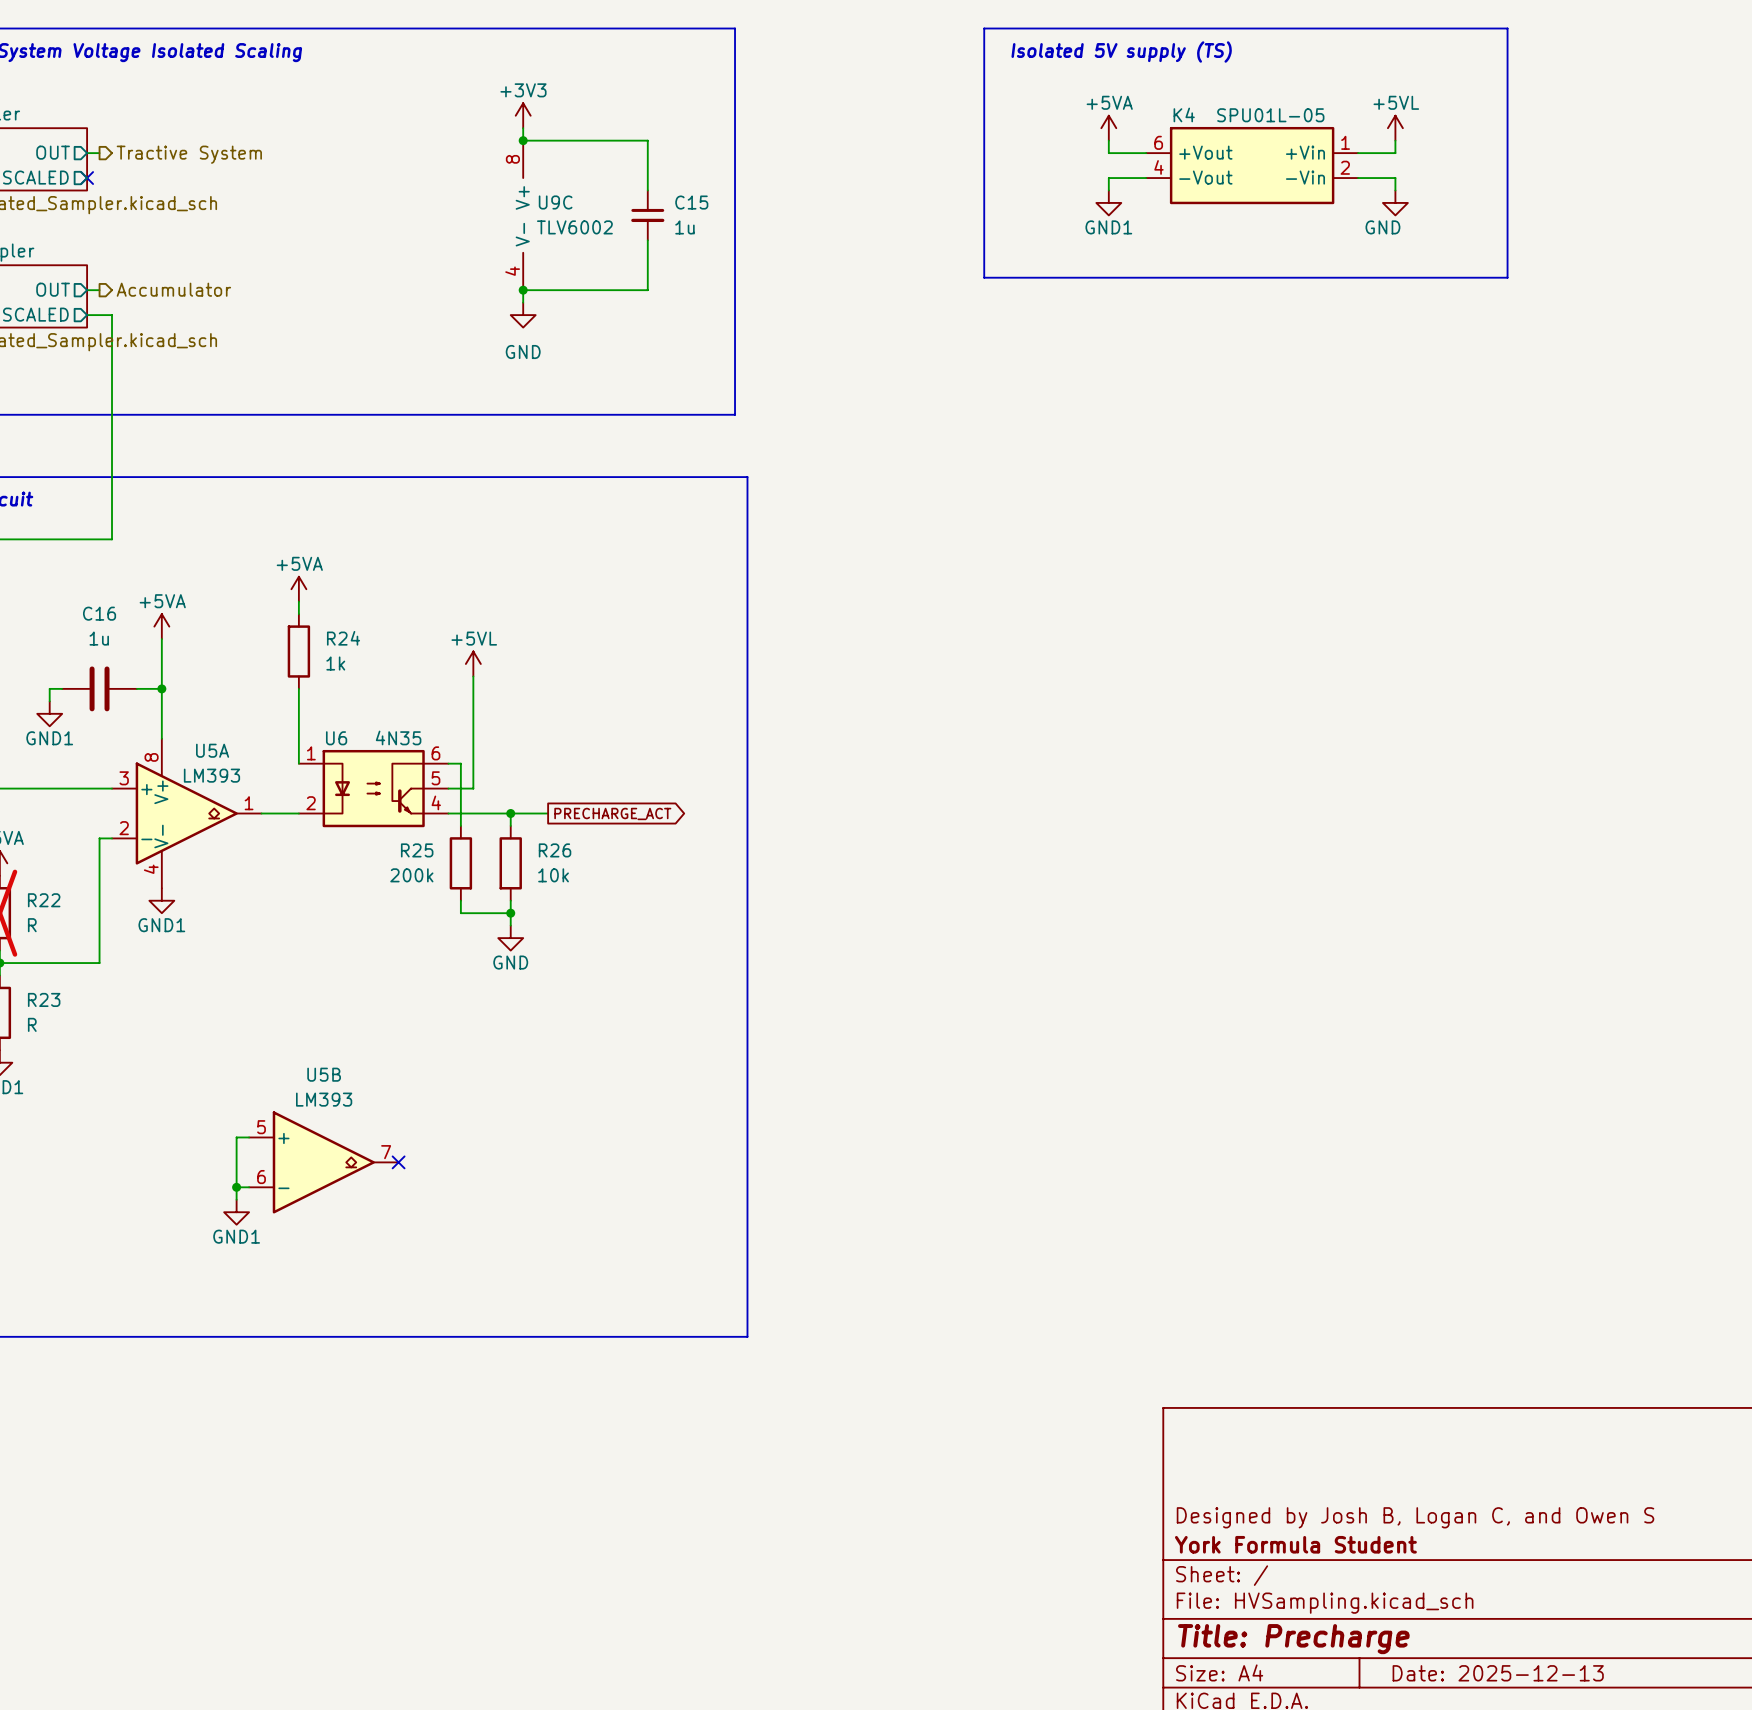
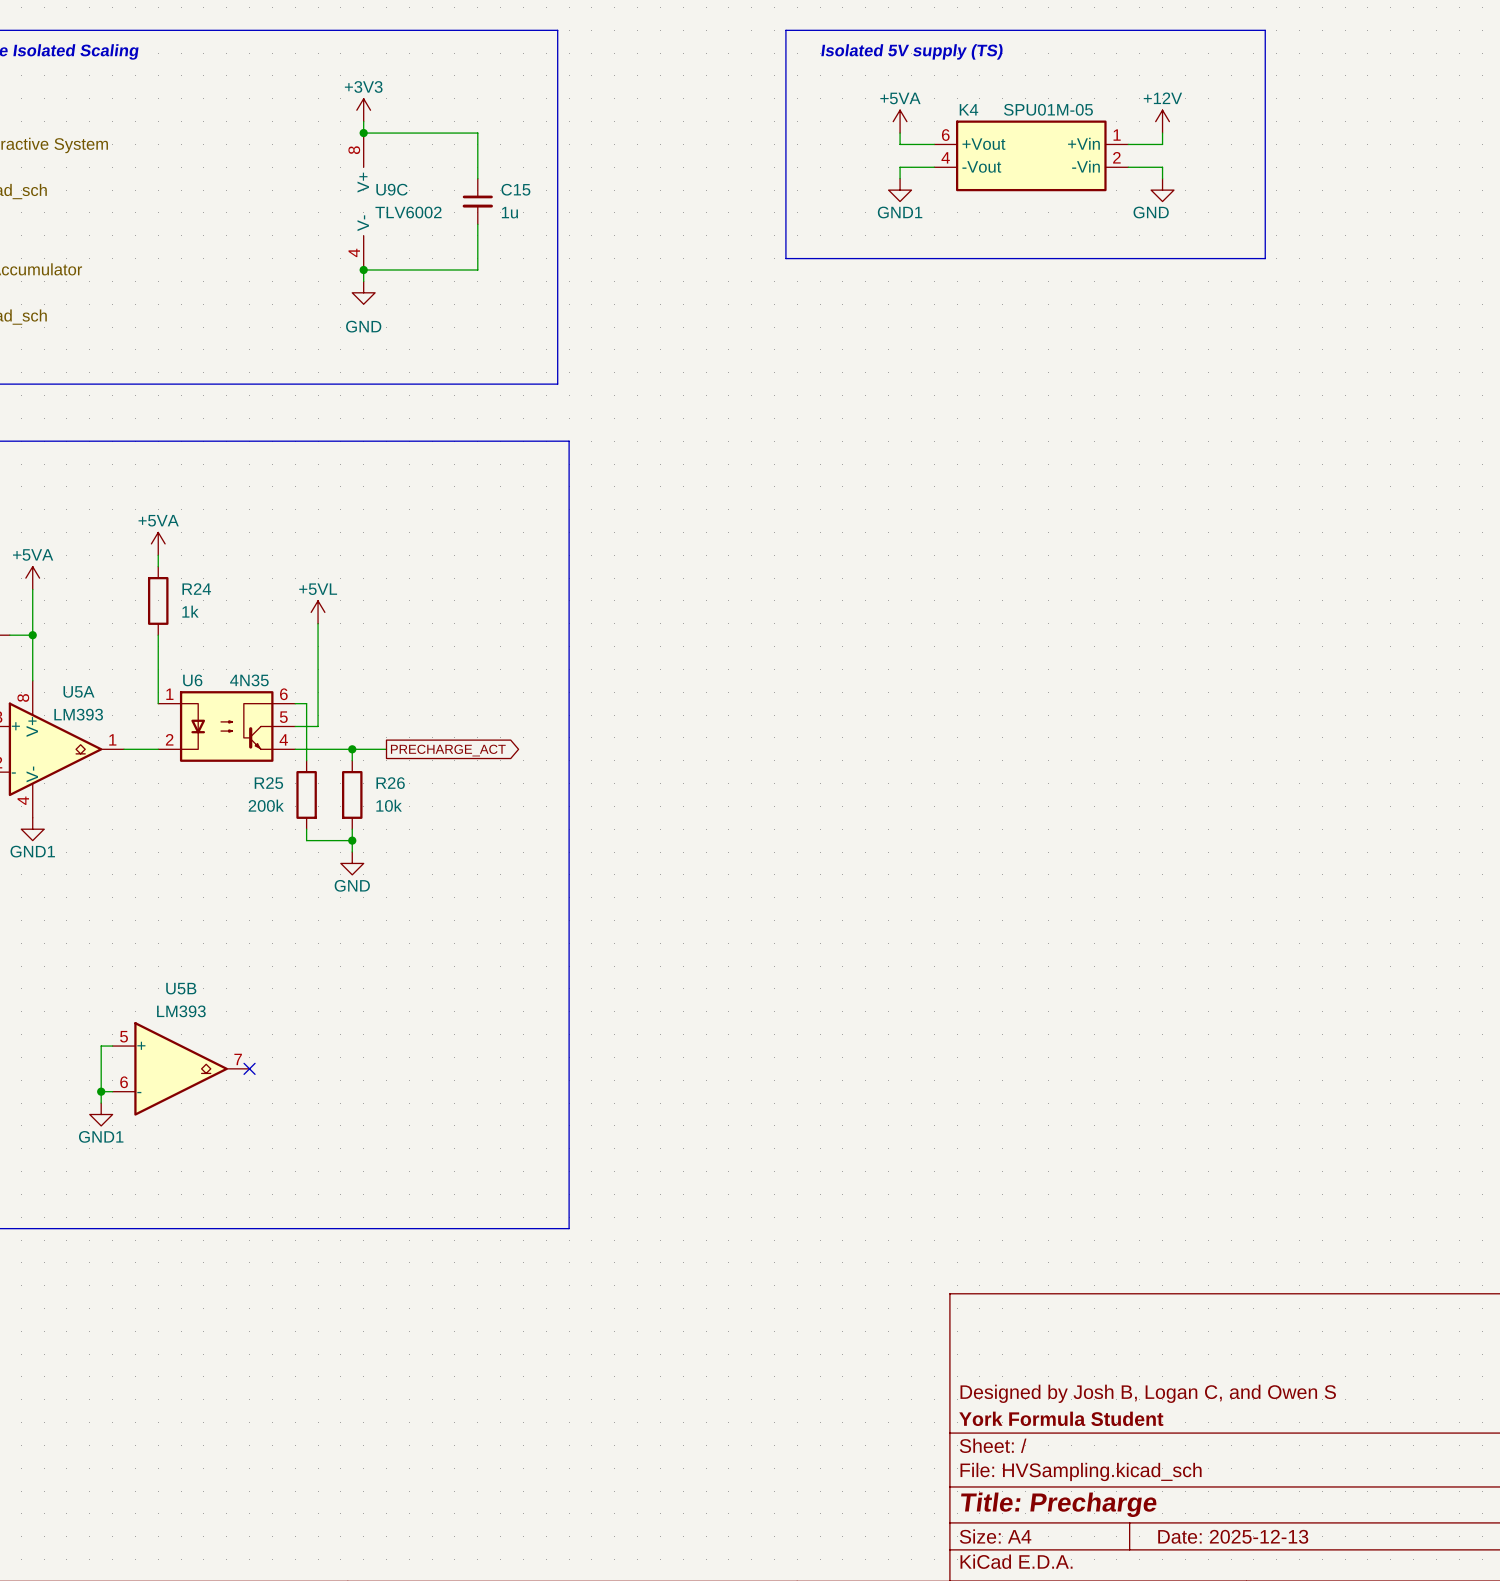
K4 value: SPU01L-05 (1270, 115) -> SPU01M-05 (1048, 109)
power symbol: +5VL (1395, 128) -> +12V (1162, 121)

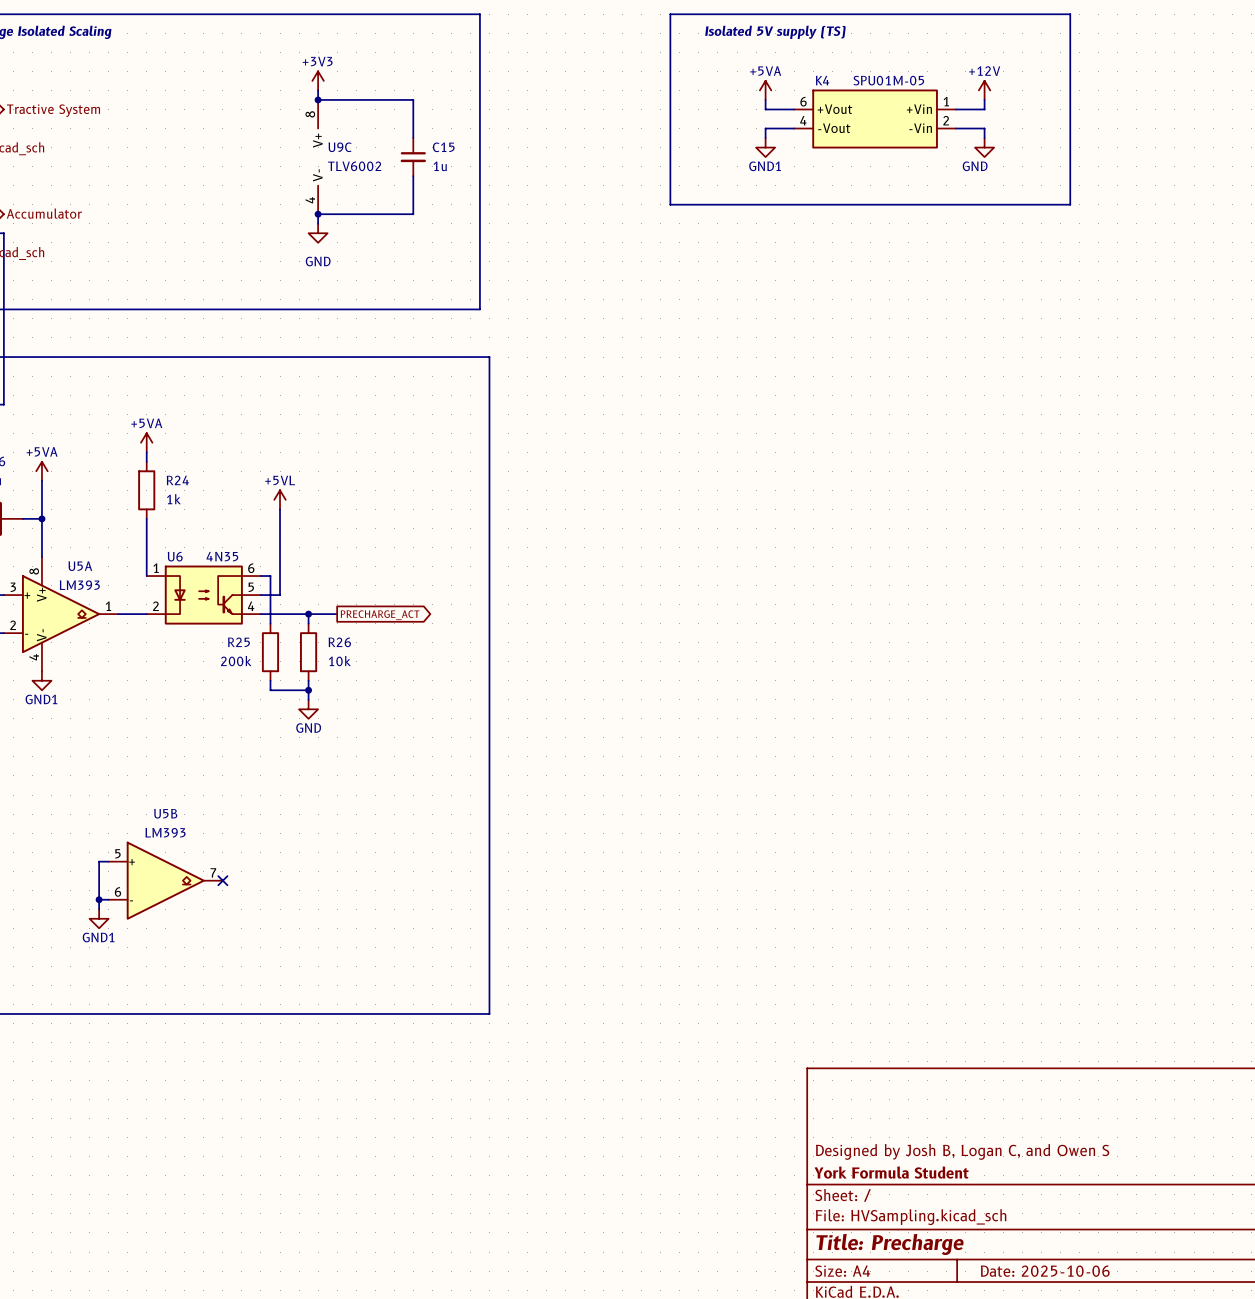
title block: Date: 2025-12-13 (1233, 1536) -> Date: 2025-10-06 (1045, 1271)

